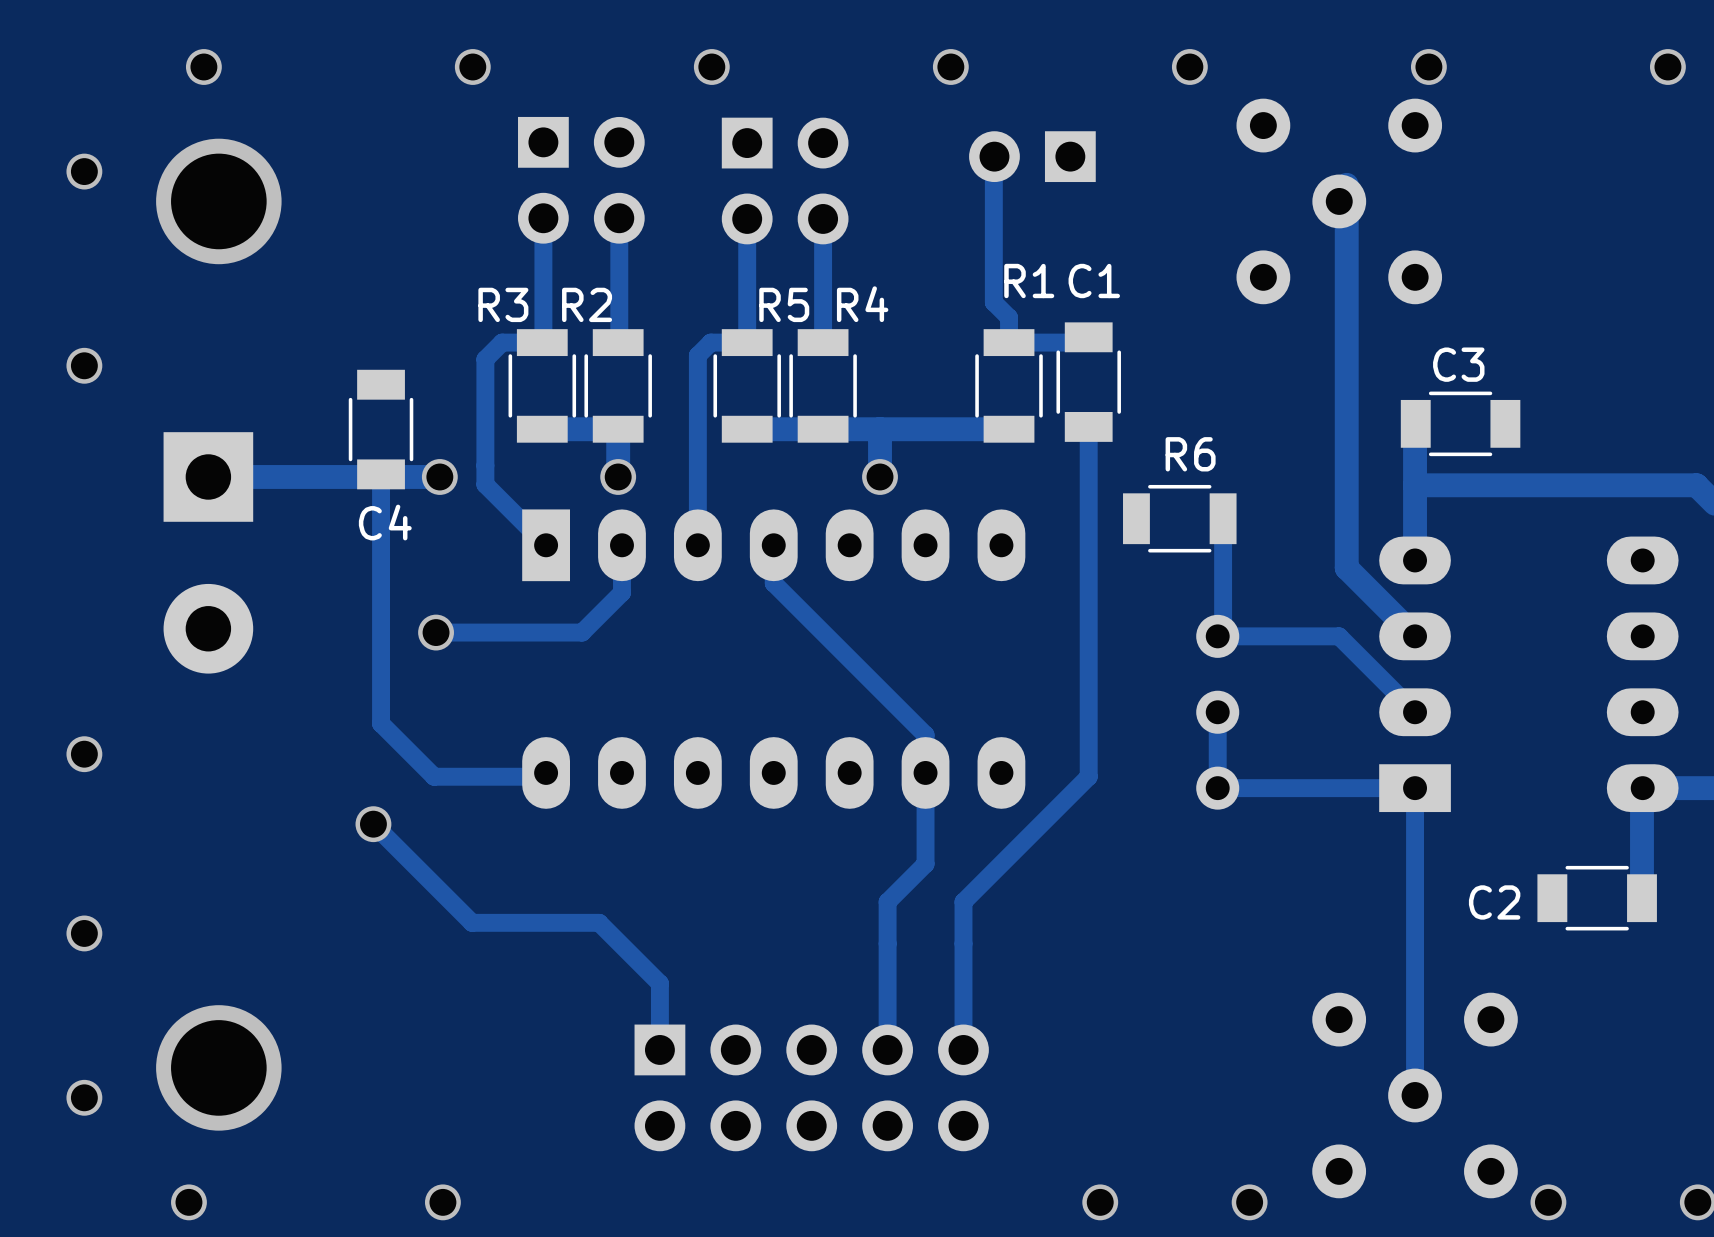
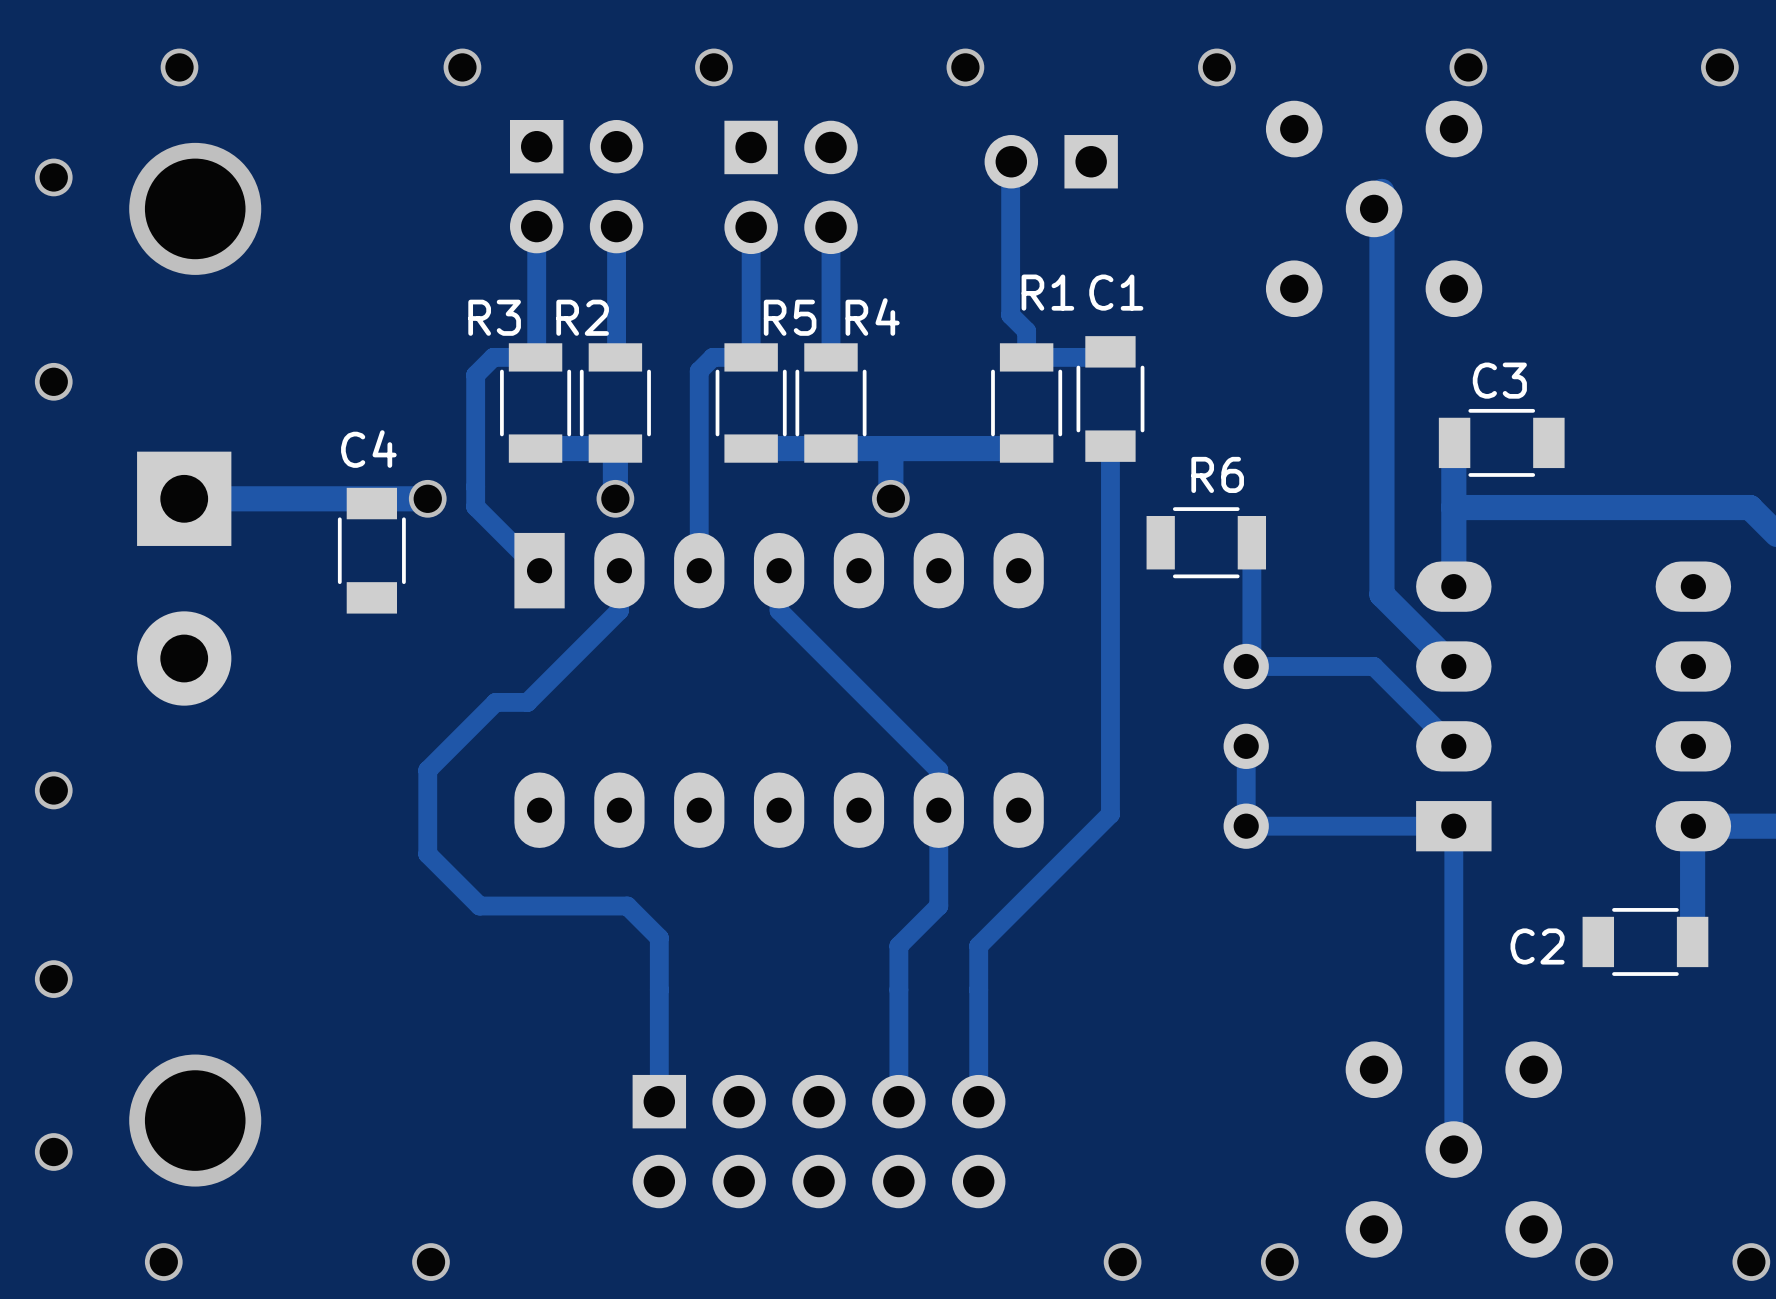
C4 position: (381, 429) -> (371, 550)
track: (381, 474) (381, 723) (434, 776) (542, 776) (546, 772) -> none
C4 name position: C4 (385, 522) -> C4 (368, 449)
track: (621, 583) (621, 592) (582, 632) (436, 632) -> none
via: (436, 632) -> none
track: (373, 824) (472, 922) (599, 922) (659, 983) -> (619, 610) (527, 702) (495, 702) (427, 770) (427, 854) (479, 906) (627, 906) (659, 937) (659, 1031)
via: (373, 824) -> none

